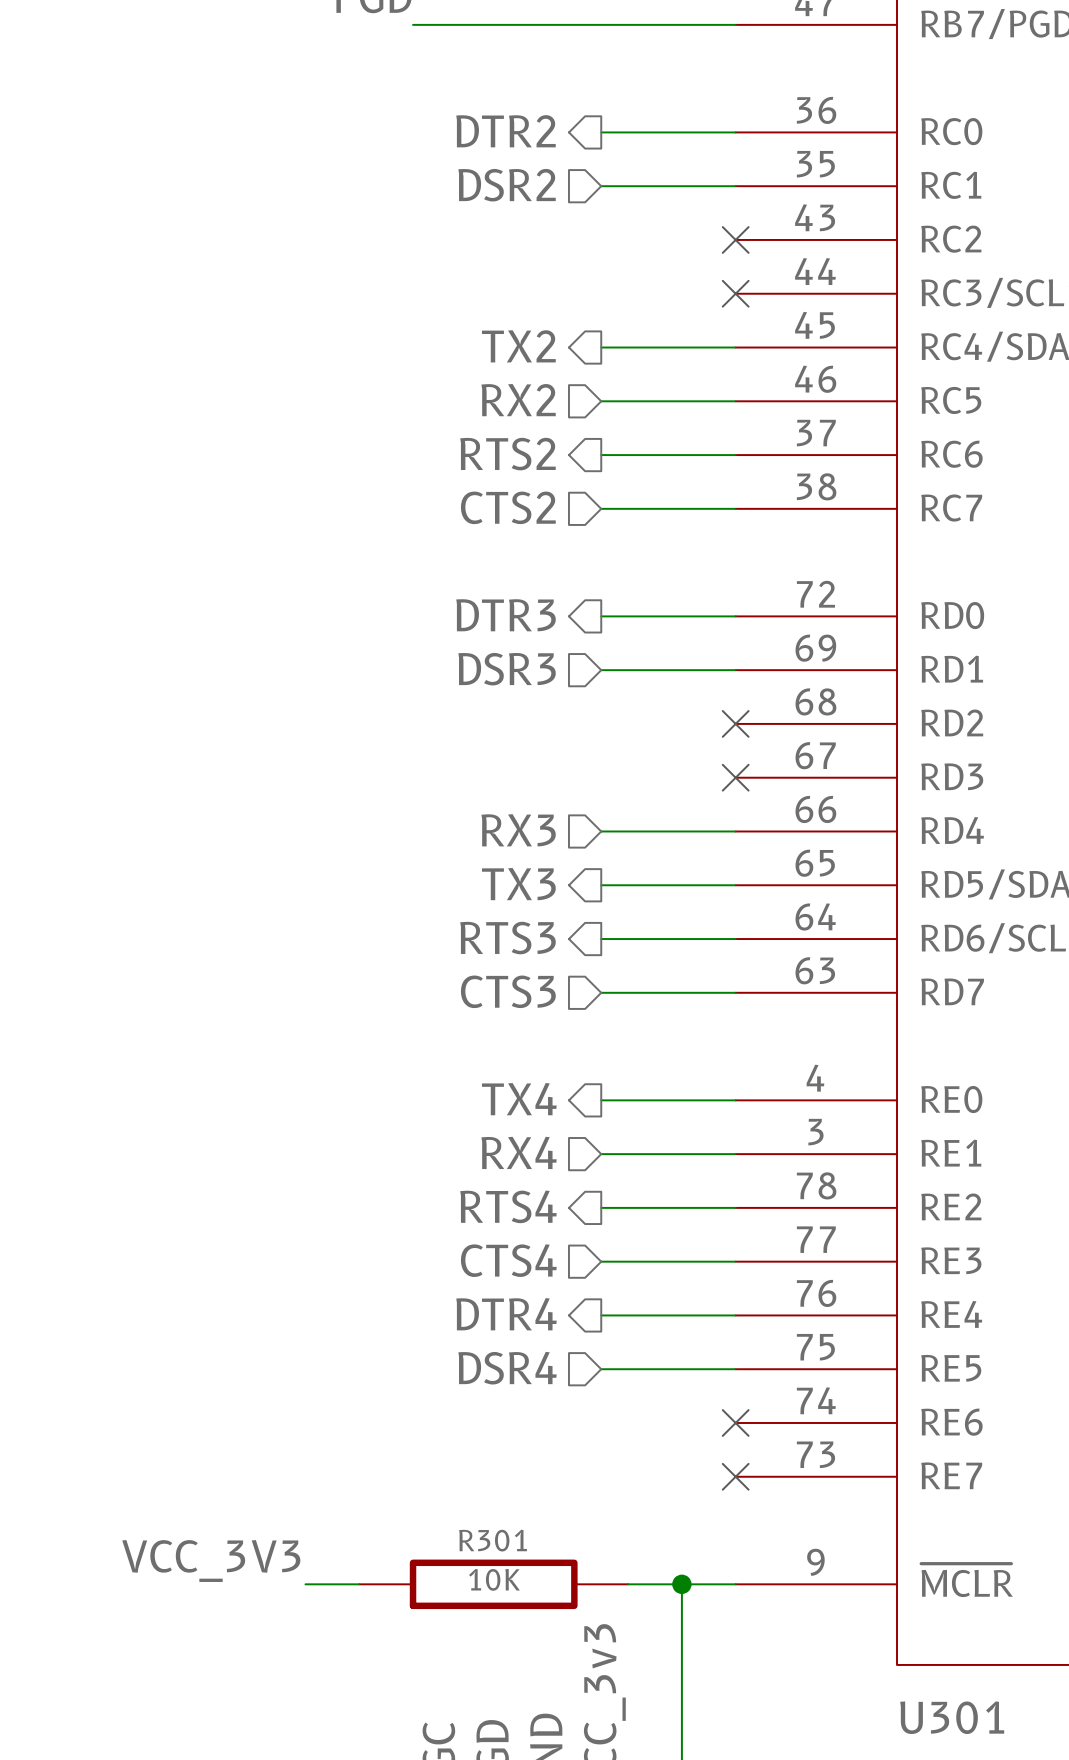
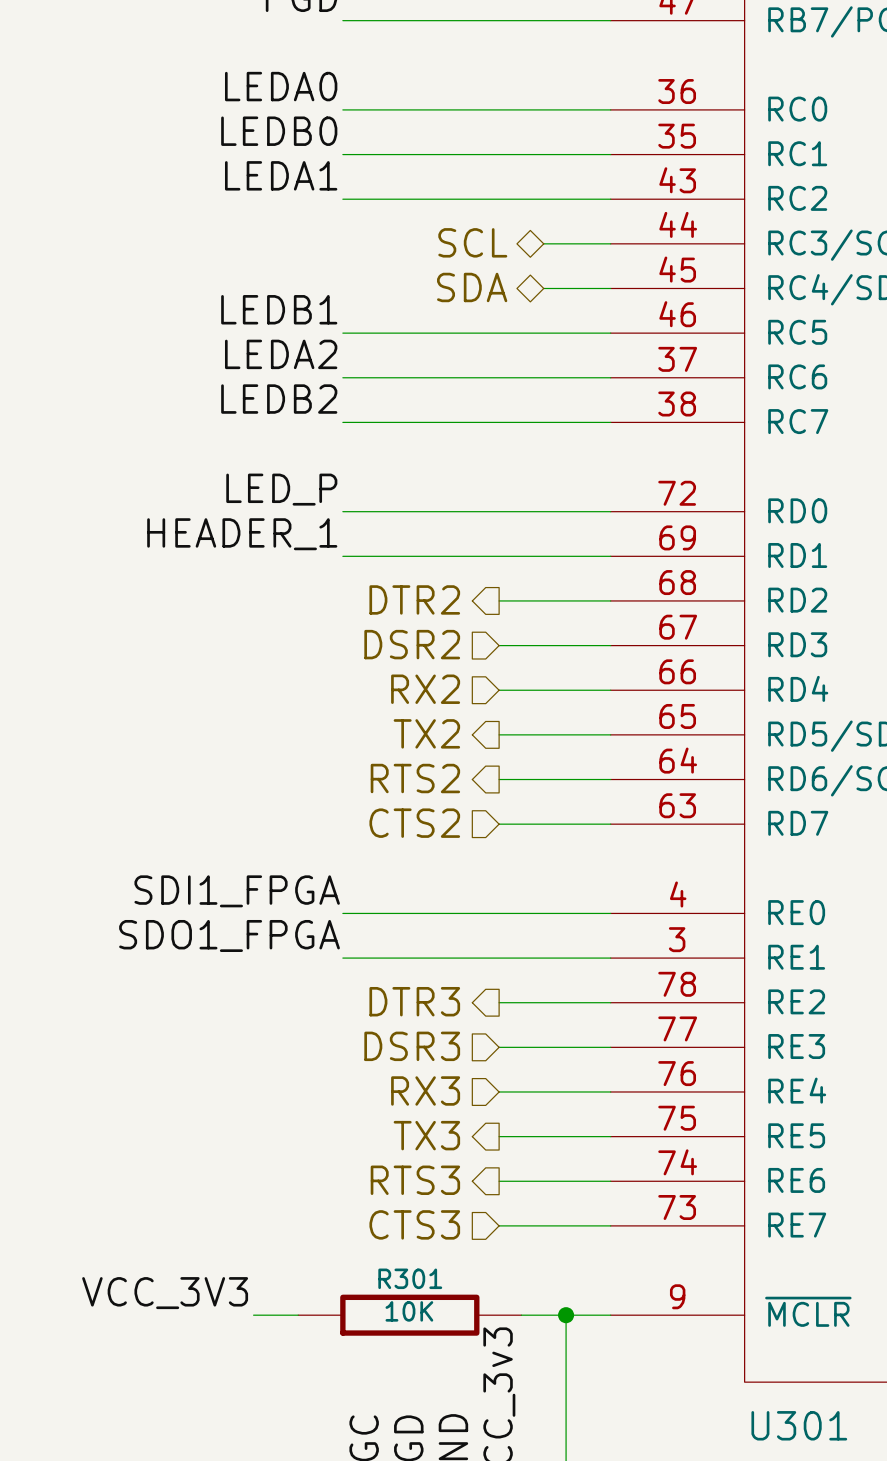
label: none -> LEDA0 (281, 86)
hierarchical label: DTR2 (506, 131) -> none
wire: none -> (342, 109) (499, 109)
label: none -> LEDB0 (279, 131)
hierarchical label: DSR2 (507, 185) -> none
wire: none -> (342, 154) (499, 154)
label: none -> LEDA1 (281, 175)
wire: none -> (342, 199) (610, 199)
no-connect mark: (735, 239) -> none
hierarchical label: none -> SCL (472, 242)
wire: none -> (543, 243) (610, 243)
no-connect mark: (735, 293) -> none
hierarchical label: TX2 (518, 346) -> none
hierarchical label: none -> SDA (472, 287)
wire: (601, 347) (655, 347) -> none
label: none -> LEDB1 (279, 309)
hierarchical label: RX2 (518, 400) -> none
wire: none -> (342, 333) (499, 333)
label: none -> LEDA2 (281, 354)
hierarchical label: RTS2 (507, 454) -> none
wire: none -> (342, 377) (499, 377)
label: none -> LEDB2 (279, 399)
hierarchical label: CTS2 (508, 507) -> none
wire: none -> (342, 422) (499, 422)
label: none -> LED_P (281, 489)
hierarchical label: DTR3 (506, 615) -> none
wire: none -> (342, 511) (499, 511)
label: none -> HEADER_1 (242, 534)
hierarchical label: DSR3 (507, 669) -> none
wire: none -> (342, 556) (499, 556)
hierarchical label: none -> DTR2 (414, 599)
wire: none -> (499, 600) (610, 600)
no-connect mark: (735, 723) -> none
hierarchical label: none -> DSR2 (412, 644)
wire: none -> (499, 645) (610, 645)
no-connect mark: (735, 777) -> none
hierarchical label: RX3 (518, 830) -> RX2 (425, 689)
hierarchical label: TX3 (518, 884) -> TX2 (426, 733)
hierarchical label: RTS3 (507, 938) -> RTS2 (415, 778)
hierarchical label: CTS3 (508, 991) -> CTS2 (414, 823)
label: none -> SDI1_FPGA (237, 891)
hierarchical label: TX4 (519, 1099) -> none
wire: none -> (342, 913) (499, 913)
label: none -> SDO1_FPGA (229, 935)
hierarchical label: RX4 (519, 1152) -> none
wire: none -> (342, 958) (499, 958)
hierarchical label: RTS4 (508, 1206) -> DTR3 (414, 1001)
hierarchical label: CTS4 (508, 1260) -> DSR3 (412, 1046)
hierarchical label shape: output (506, 1314) -> input (425, 1090)
hierarchical label: DTR4 (506, 1314) -> RX3 (425, 1090)
hierarchical label shape: input (507, 1368) -> output (426, 1135)
hierarchical label: DSR4 (507, 1368) -> TX3 (426, 1135)
hierarchical label: none -> RTS3 (415, 1180)
wire: none -> (499, 1181) (610, 1181)
no-connect mark: (735, 1422) -> none
hierarchical label: none -> CTS3 (414, 1224)
wire: none -> (499, 1225) (610, 1225)
no-connect mark: (735, 1476) -> none

